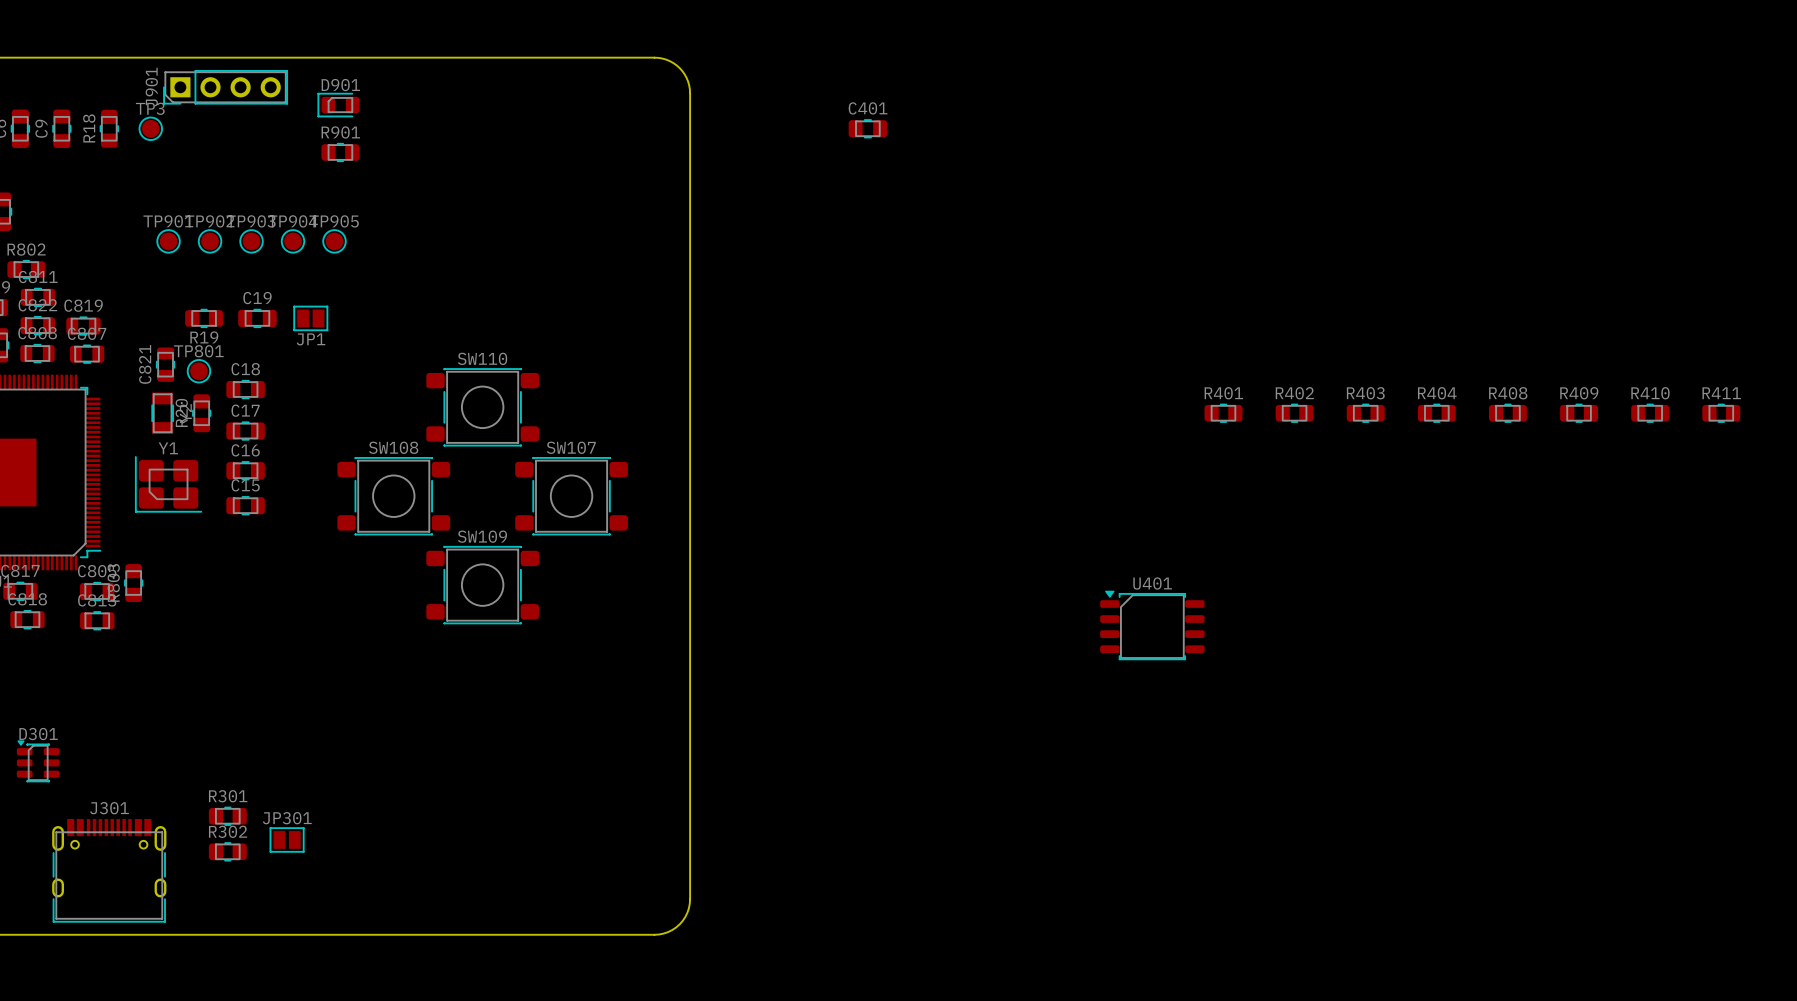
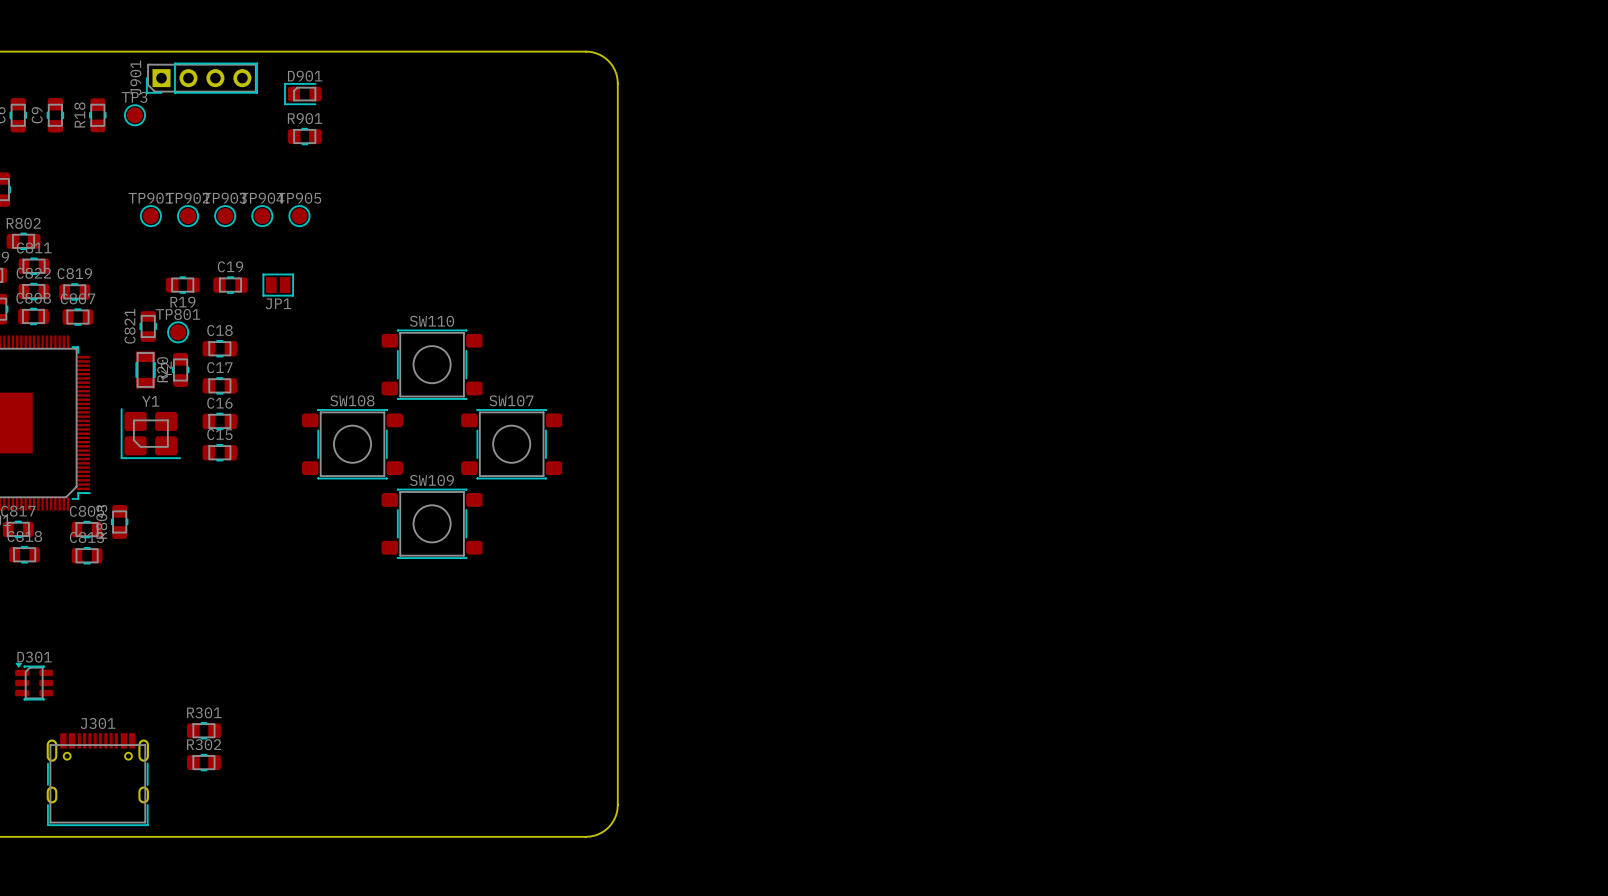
C401: (867, 128) -> none
R401: (1223, 413) -> none
R402: (1294, 413) -> none
R403: (1365, 413) -> none
R404: (1436, 413) -> none
R408: (1507, 413) -> none
R409: (1579, 413) -> none
R410: (1650, 413) -> none
R411: (1721, 413) -> none
U401: (1152, 625) -> none
JP301: (287, 839) -> none

